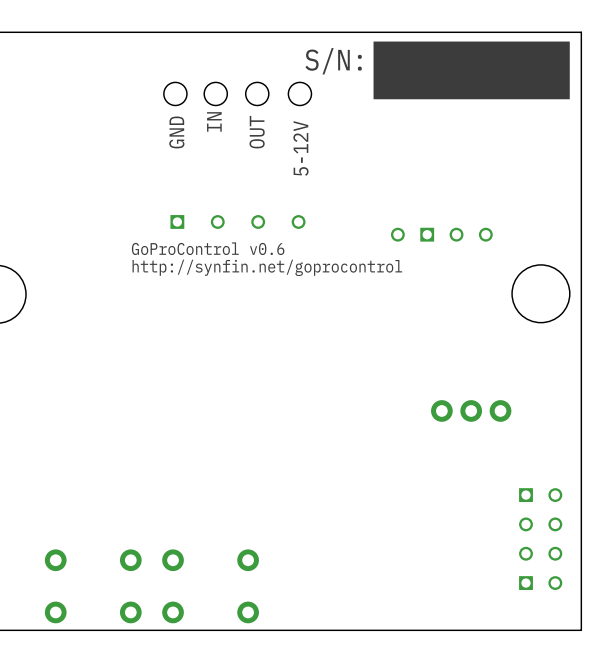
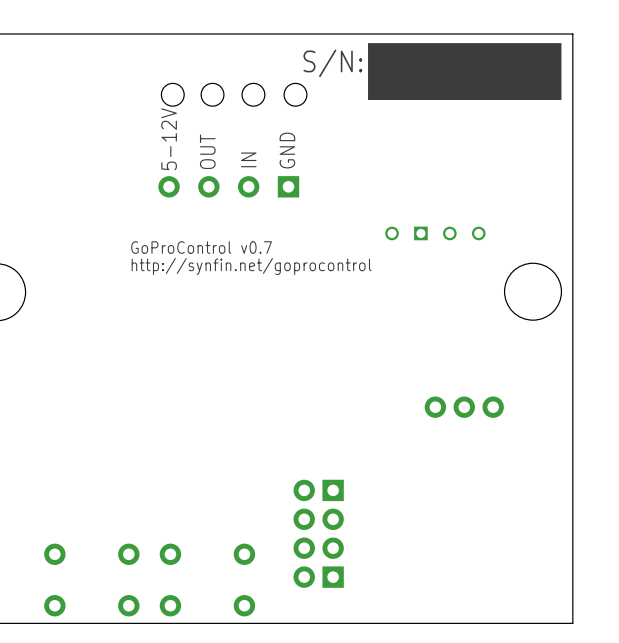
text position: IN (214, 121) -> IN (248, 159)
text: GND (176, 132) -> none
text position: OUT (257, 132) -> OUT (207, 151)
text: none -> 5-12V (169, 139)
text: 5-12V (300, 148) -> GND (287, 150)
part: none -> (228, 186)
part: (237, 221) -> none
text: GoProControl v0.6 (208, 248) -> GoProControl v0.7 (201, 247)
part: none -> (318, 533)
part: (540, 539) -> none

